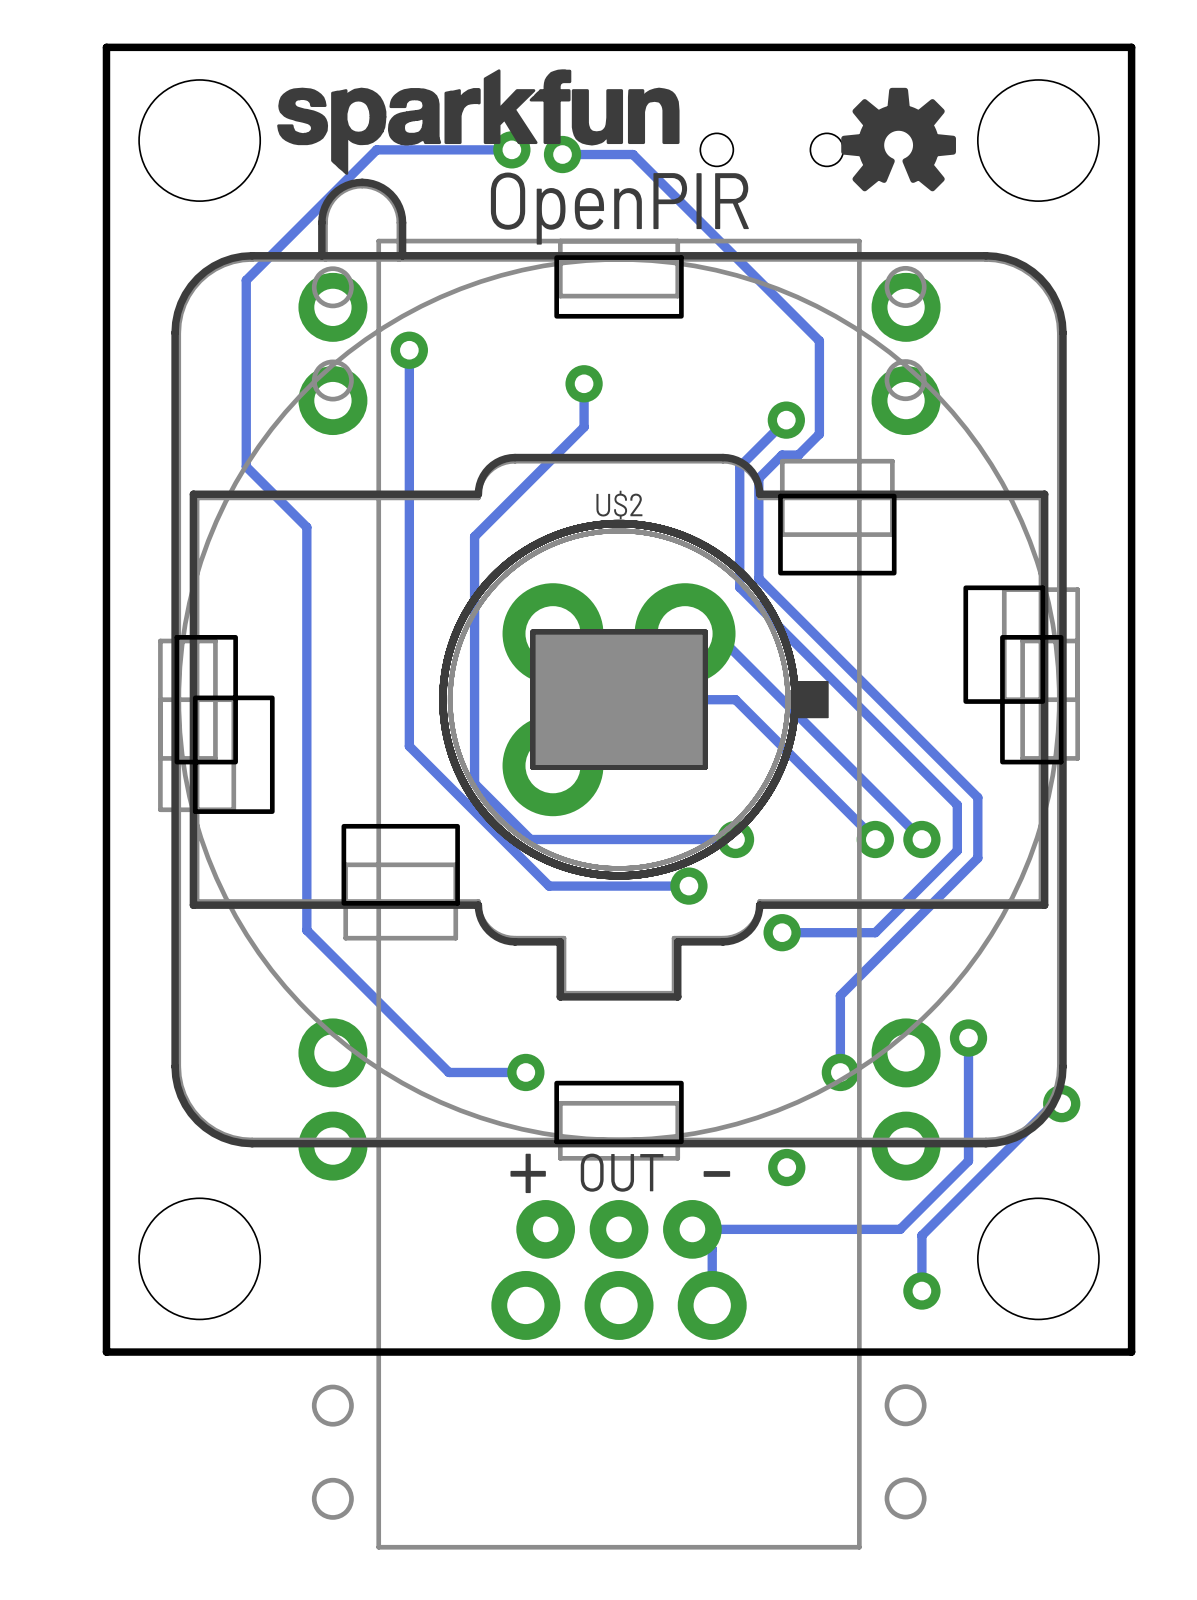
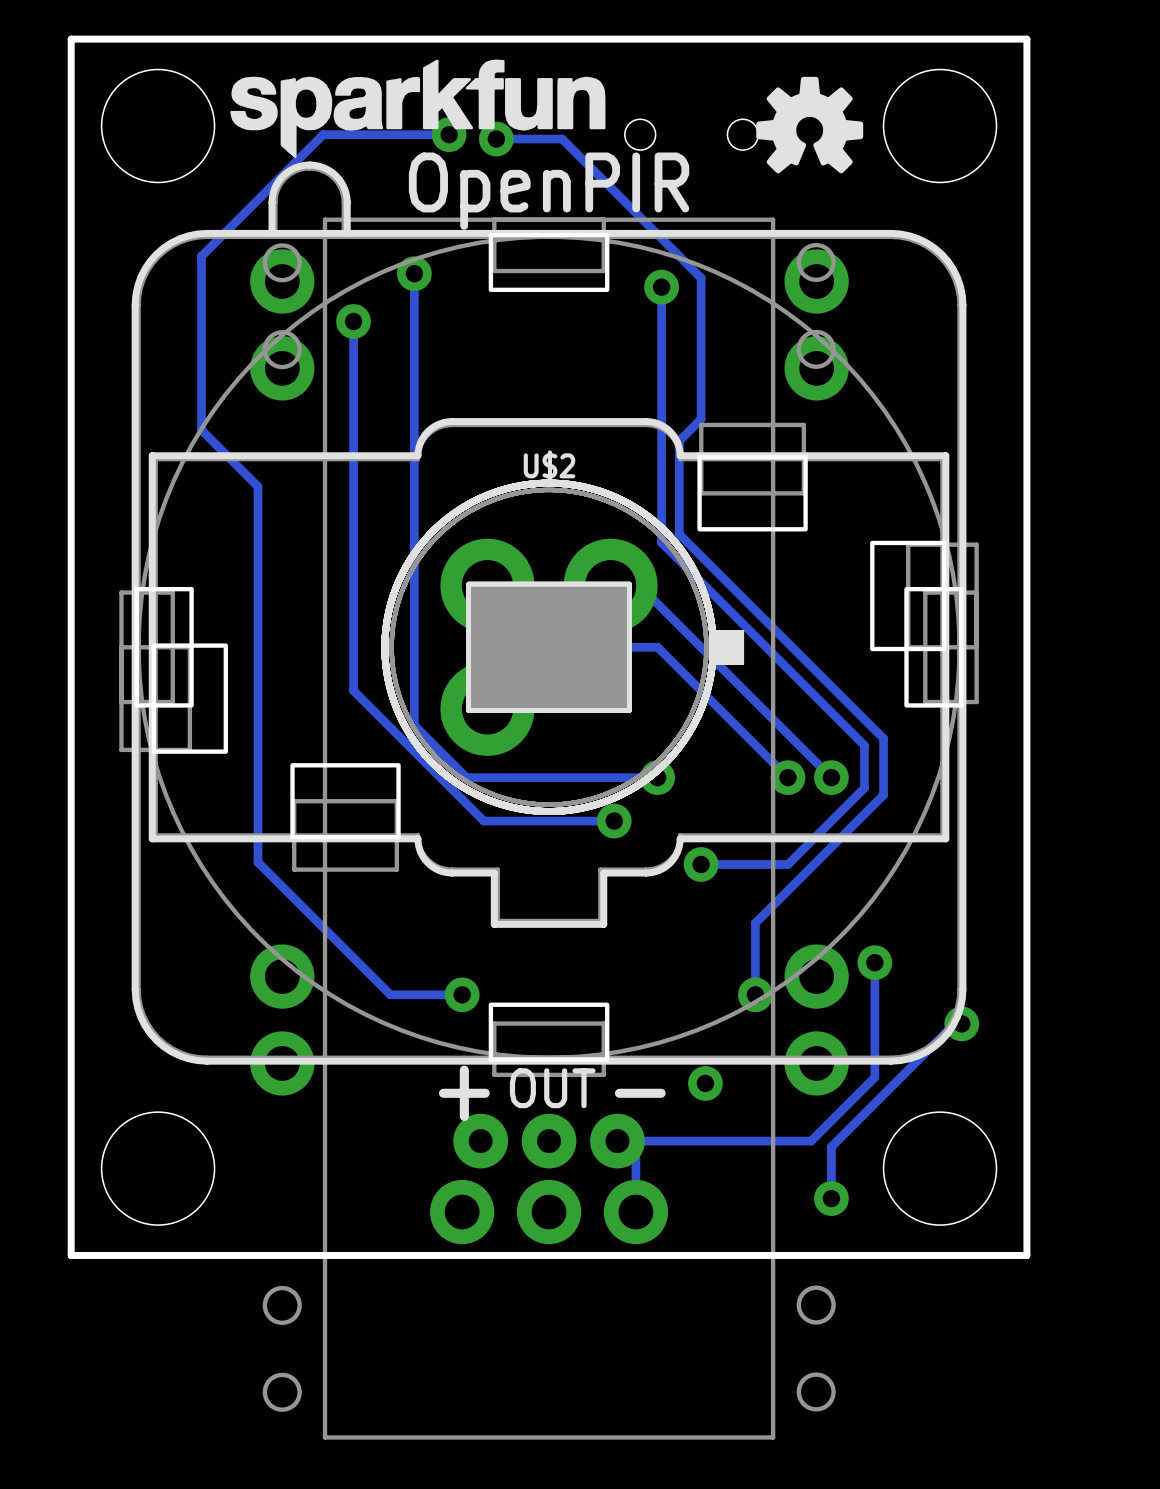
via: none -> (414, 273)
track: (782, 303) (819, 340) (819, 434) (798, 455) (782, 455) -> (701, 278) (701, 419)
via: none -> (661, 287)
track: (584, 383) (584, 427) (474, 536) -> (414, 273) (414, 495)
via: (584, 383) -> none
track: (786, 420) (739, 466) -> (661, 287) (661, 430)
via: (786, 420) -> none

